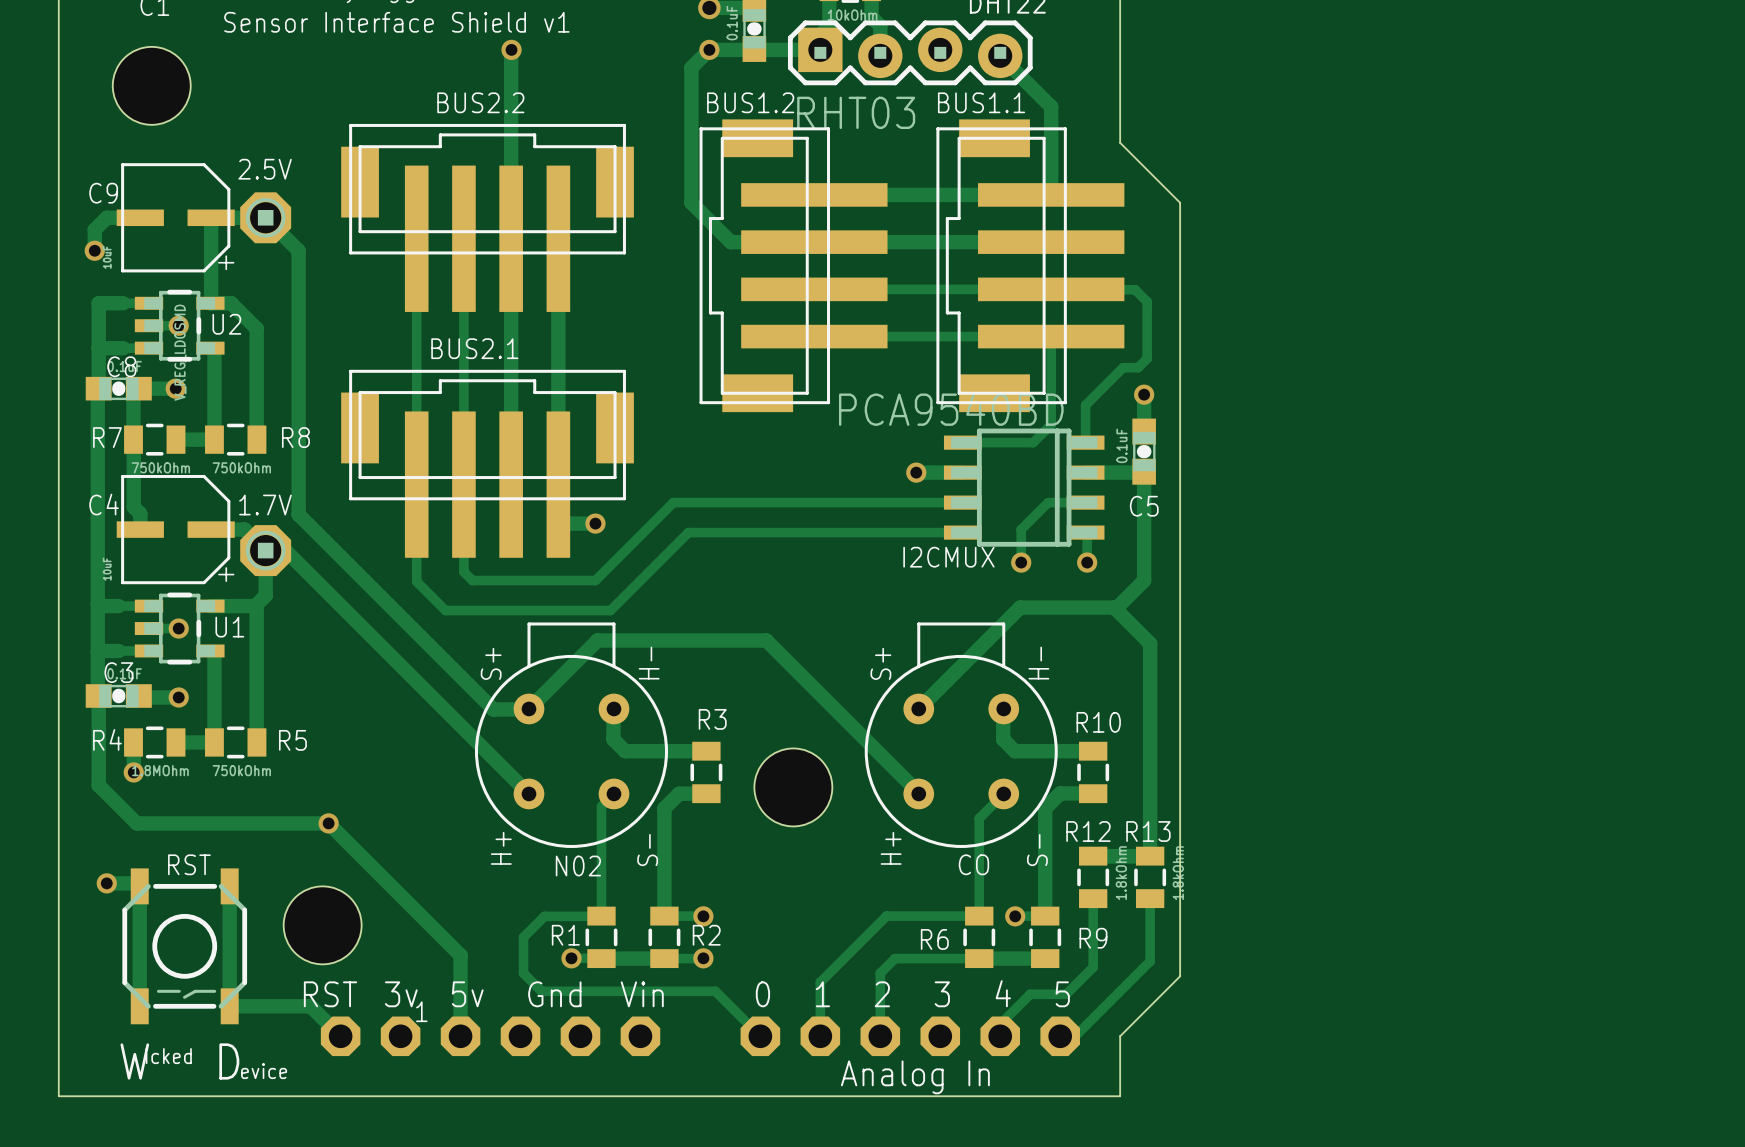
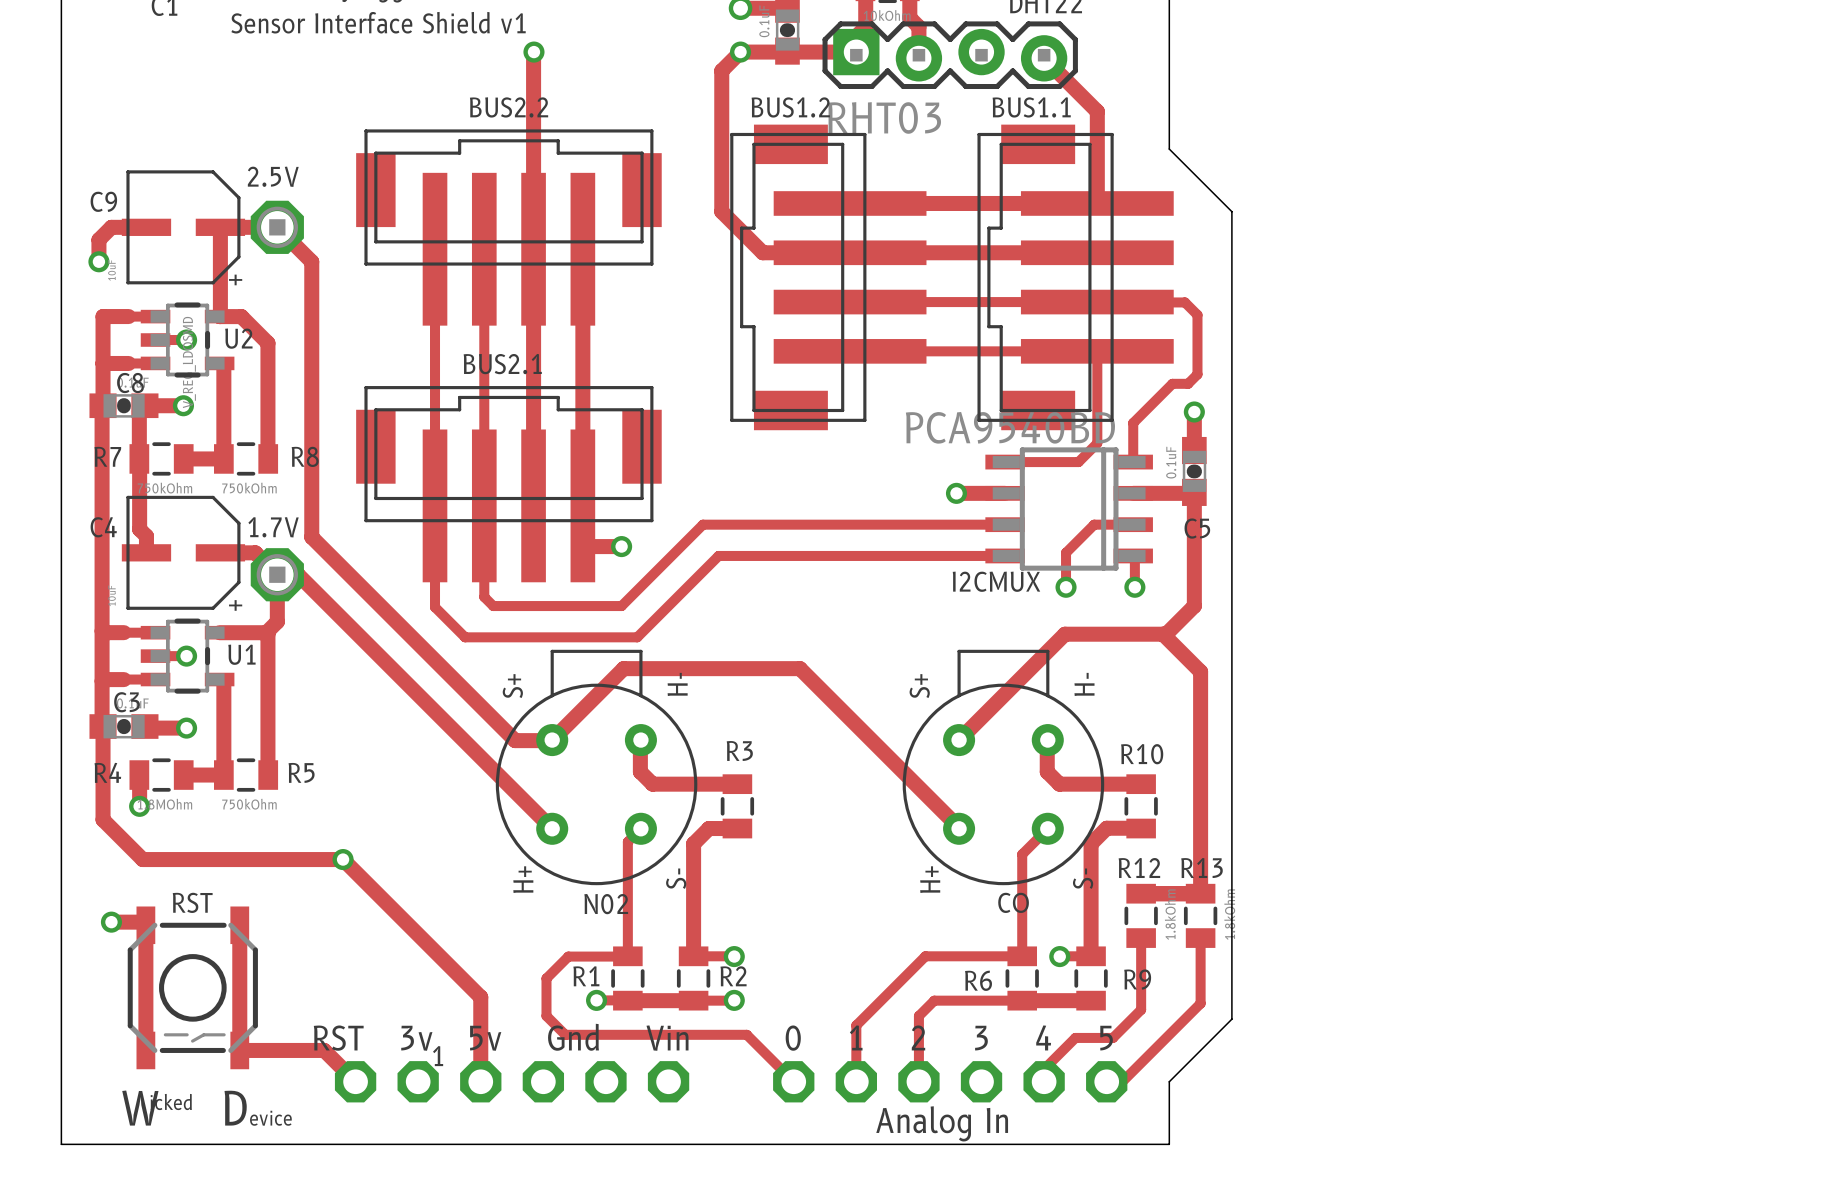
part: (151, 85) -> none
part: (793, 787) -> none
part: (322, 925) -> none

